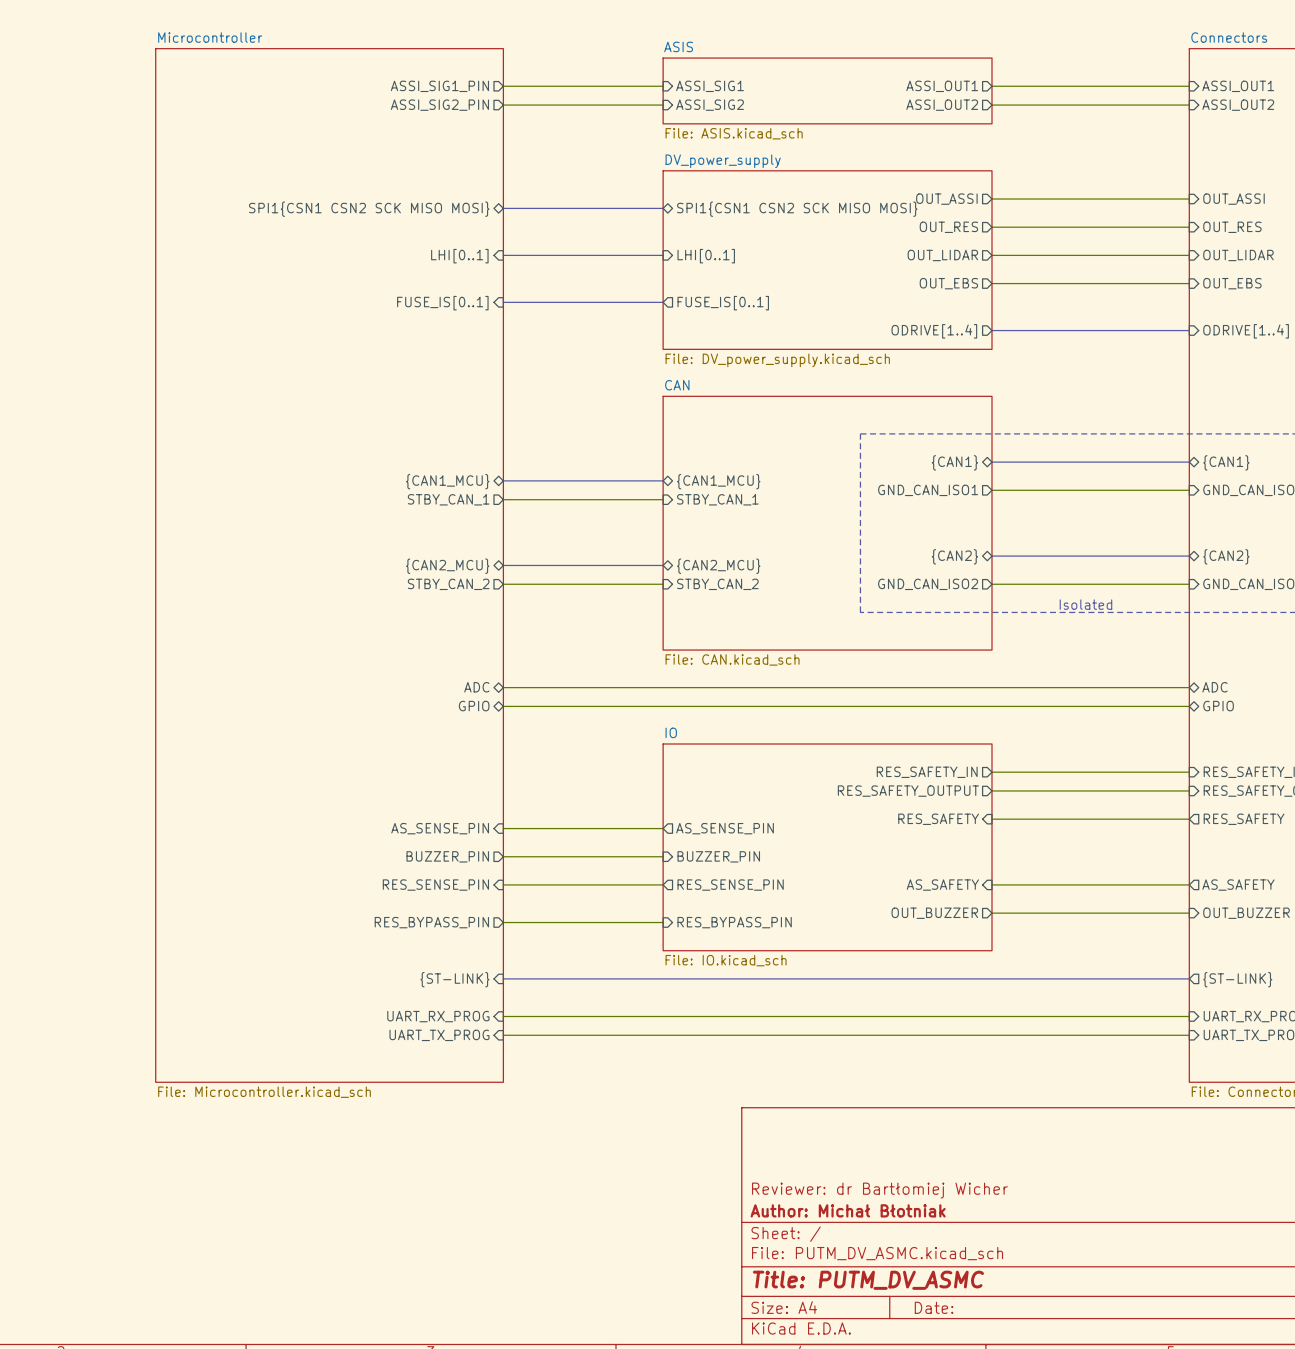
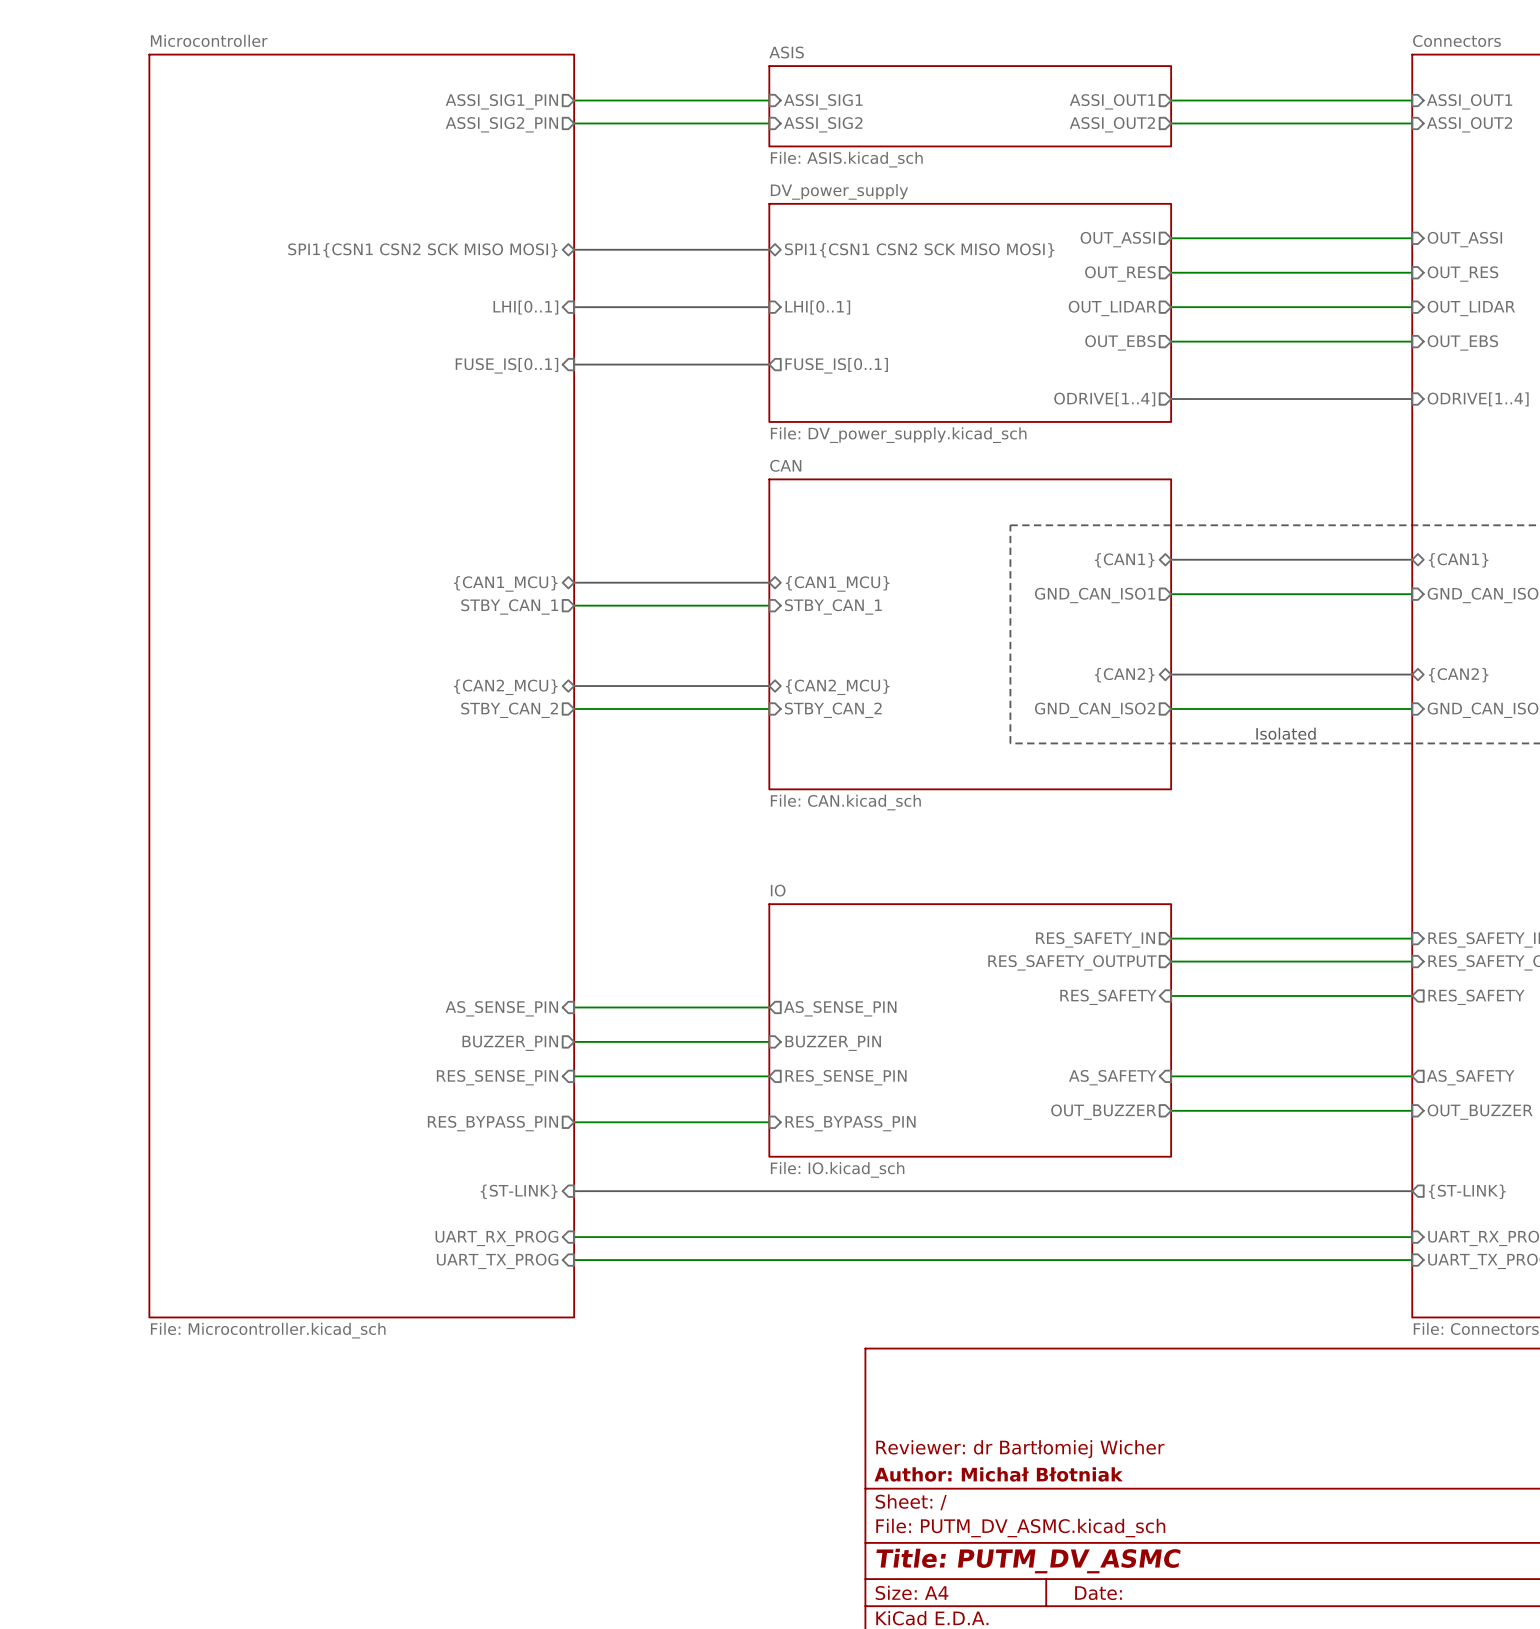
sheet pin: ADC (476, 687) -> none
wire: (503, 687) (1189, 687) -> none
sheet pin: ADC (1214, 687) -> none
sheet pin: GPIO (474, 706) -> none
wire: (503, 706) (1189, 706) -> none
sheet pin: GPIO (1218, 706) -> none

